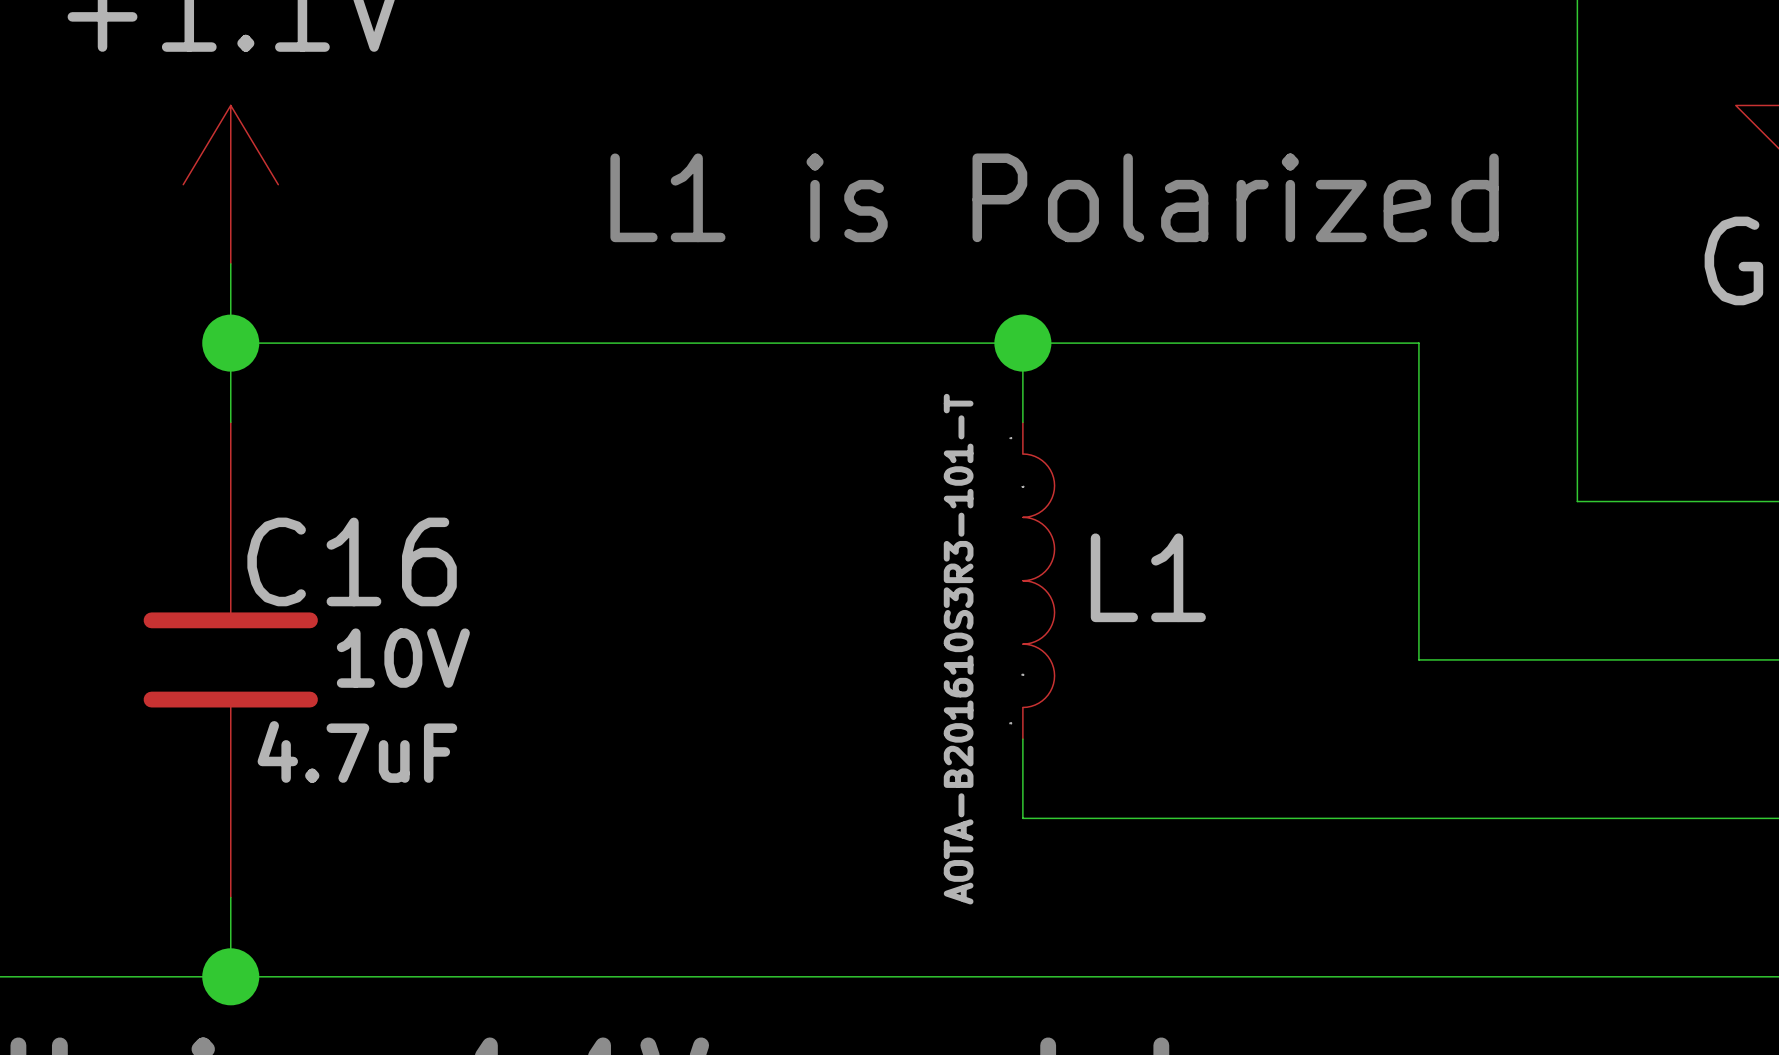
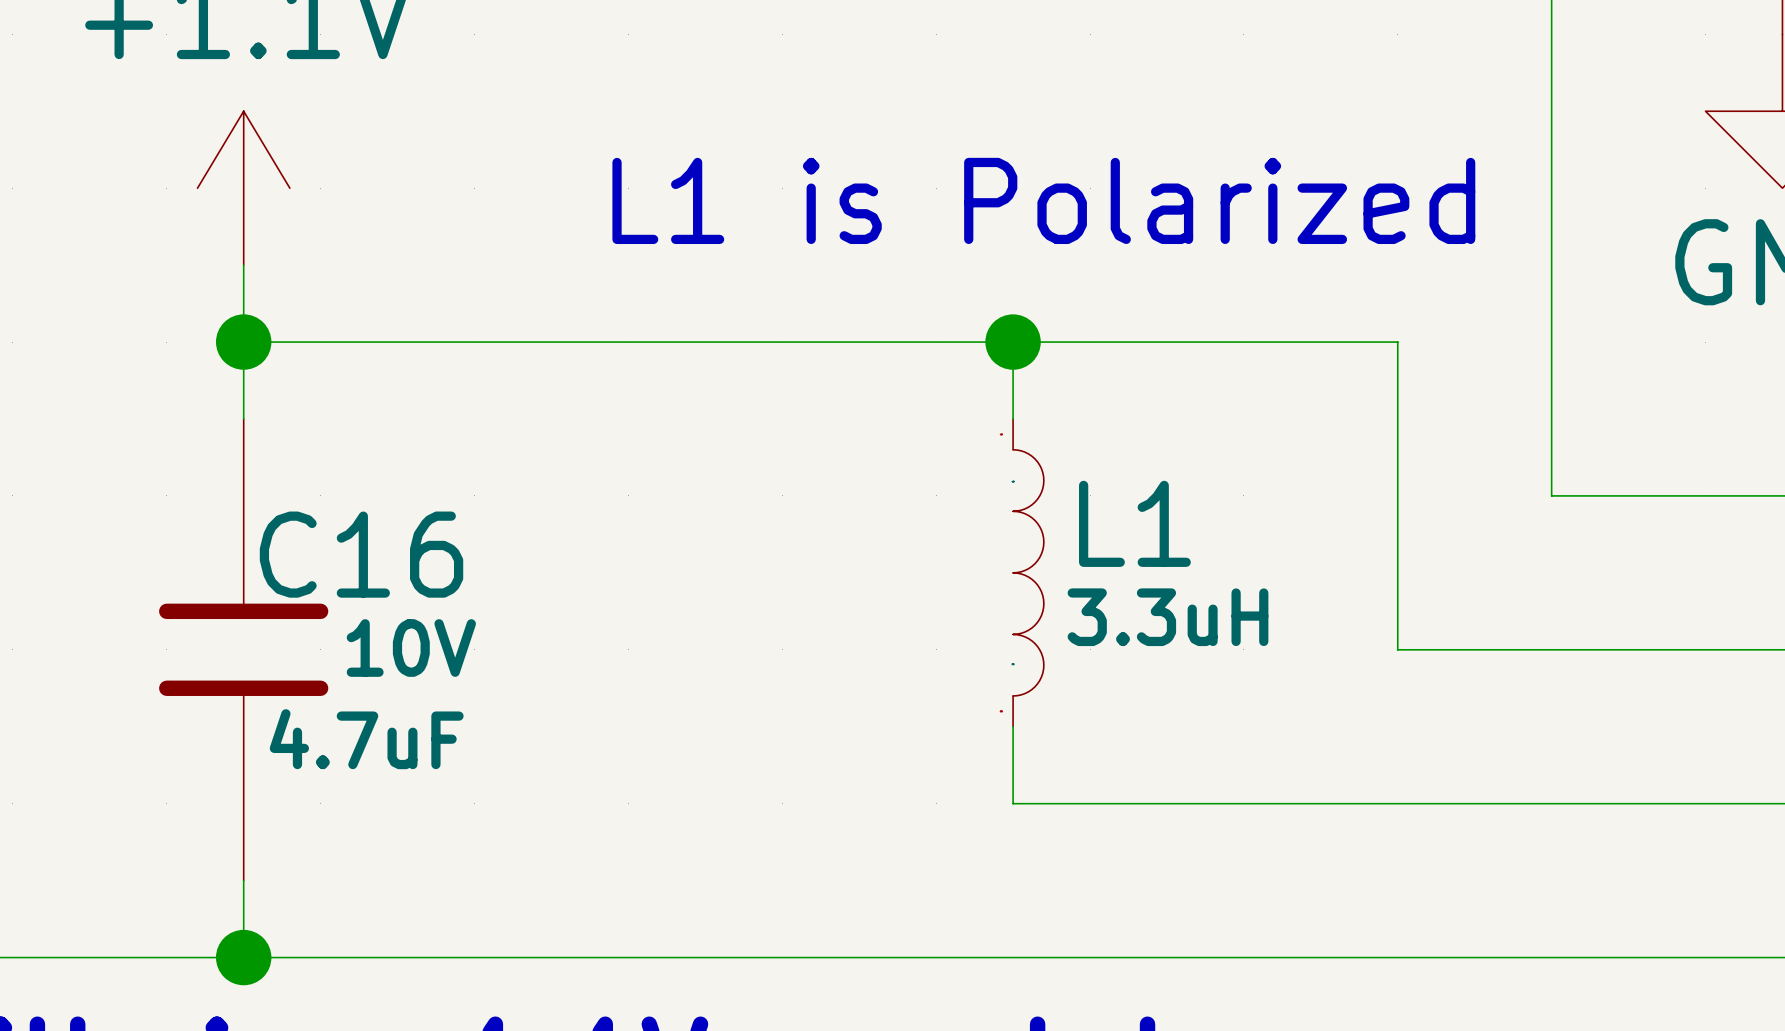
L1 name position: L1 (1148, 577) -> L1 (1134, 523)
L1 value: AOTA-B201610S3R3-101-T (958, 649) -> 3.3uH (1168, 617)

